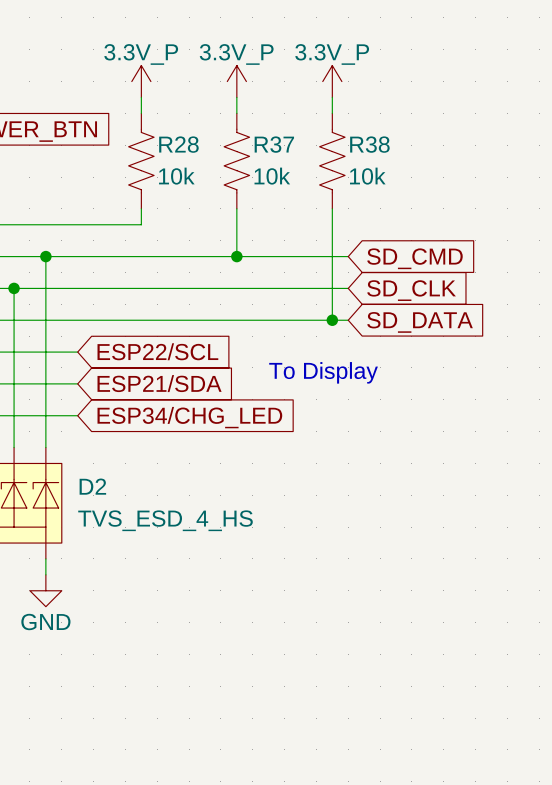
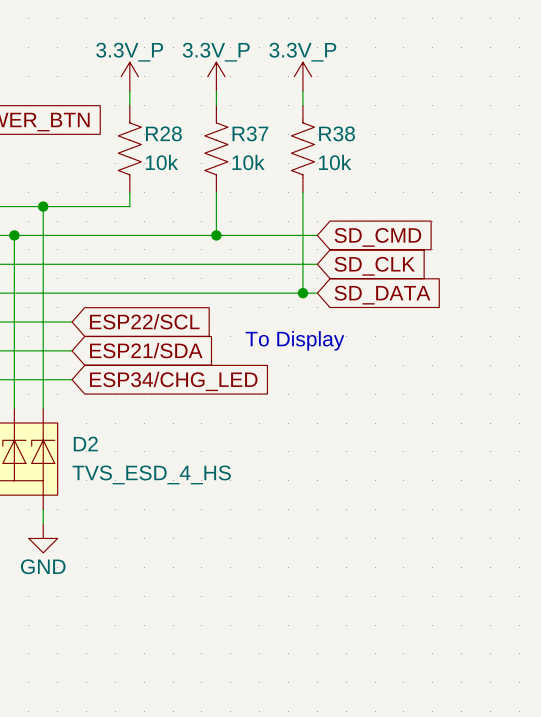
wire: none -> (43, 206) (43, 235)
junction: none -> (43, 206)
wire: none -> (14, 235) (14, 264)
junction: none -> (14, 235)
junction: (45, 256) -> none
junction: (14, 288) -> none

